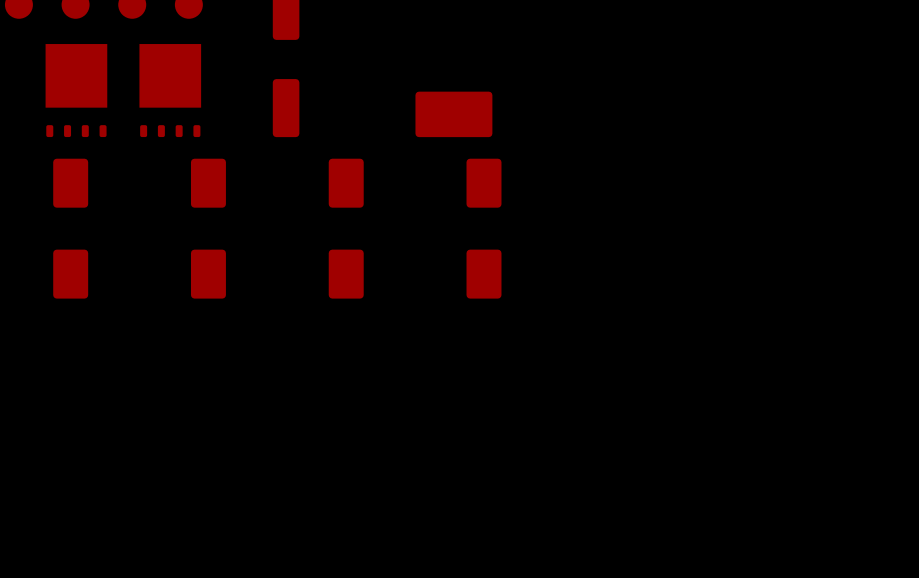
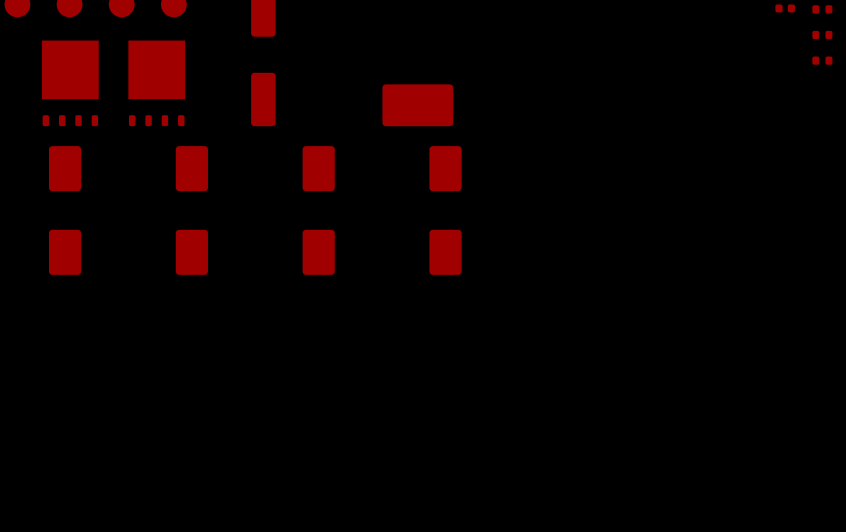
part: none -> (785, 8)
part: none -> (822, 9)
part: none -> (822, 34)
part: none -> (822, 60)

